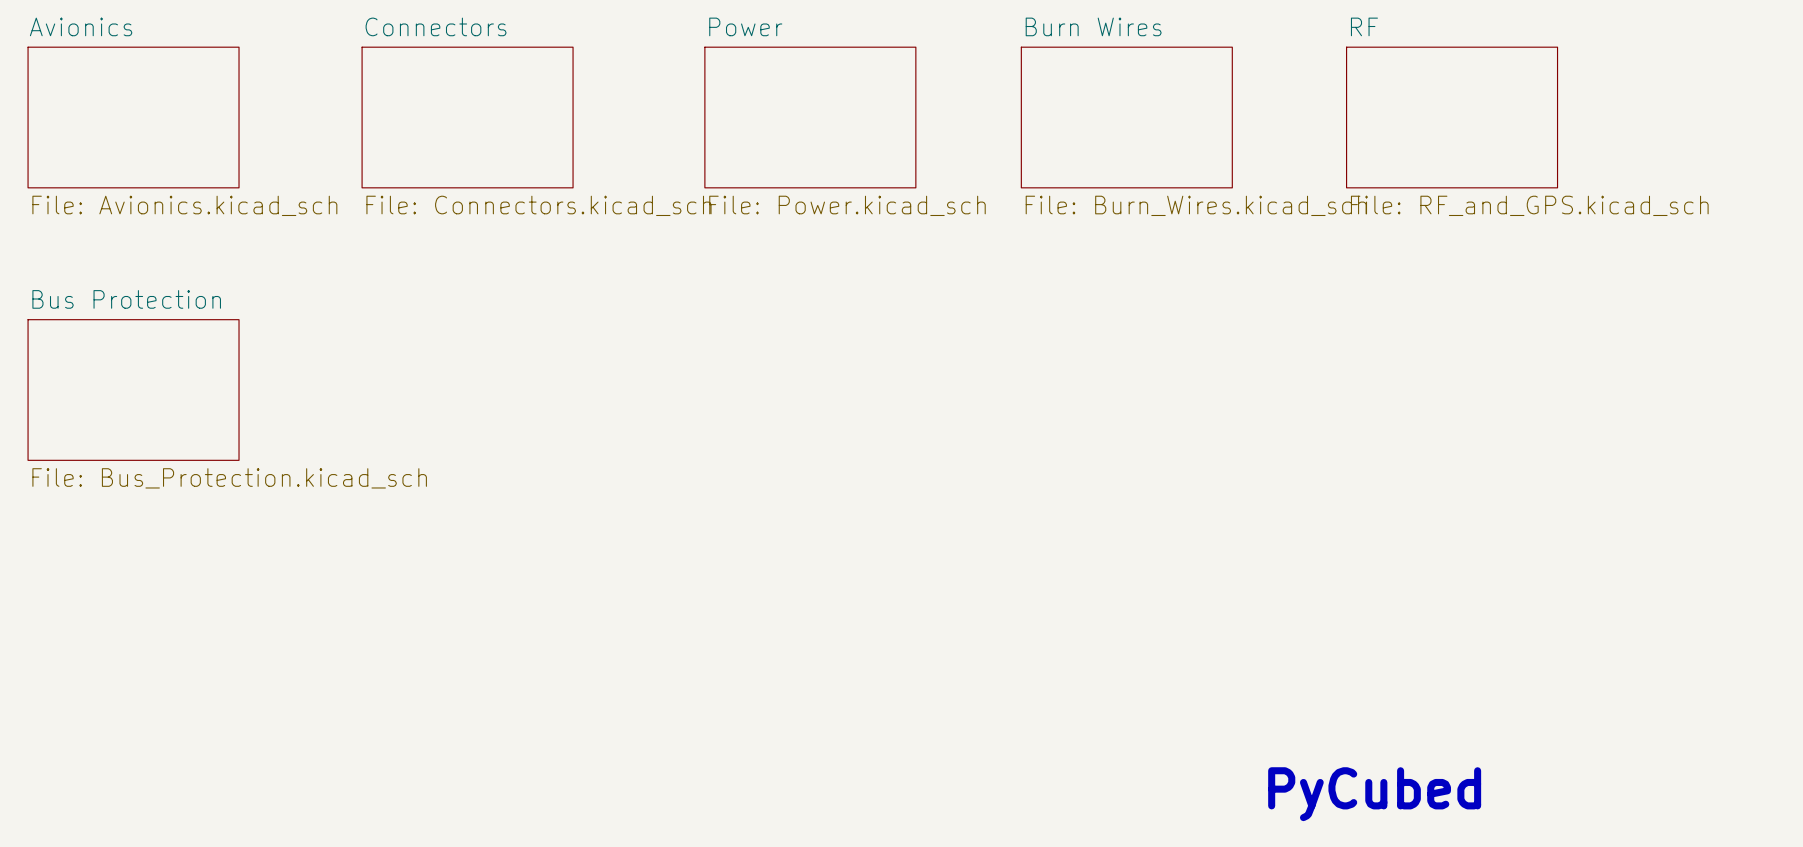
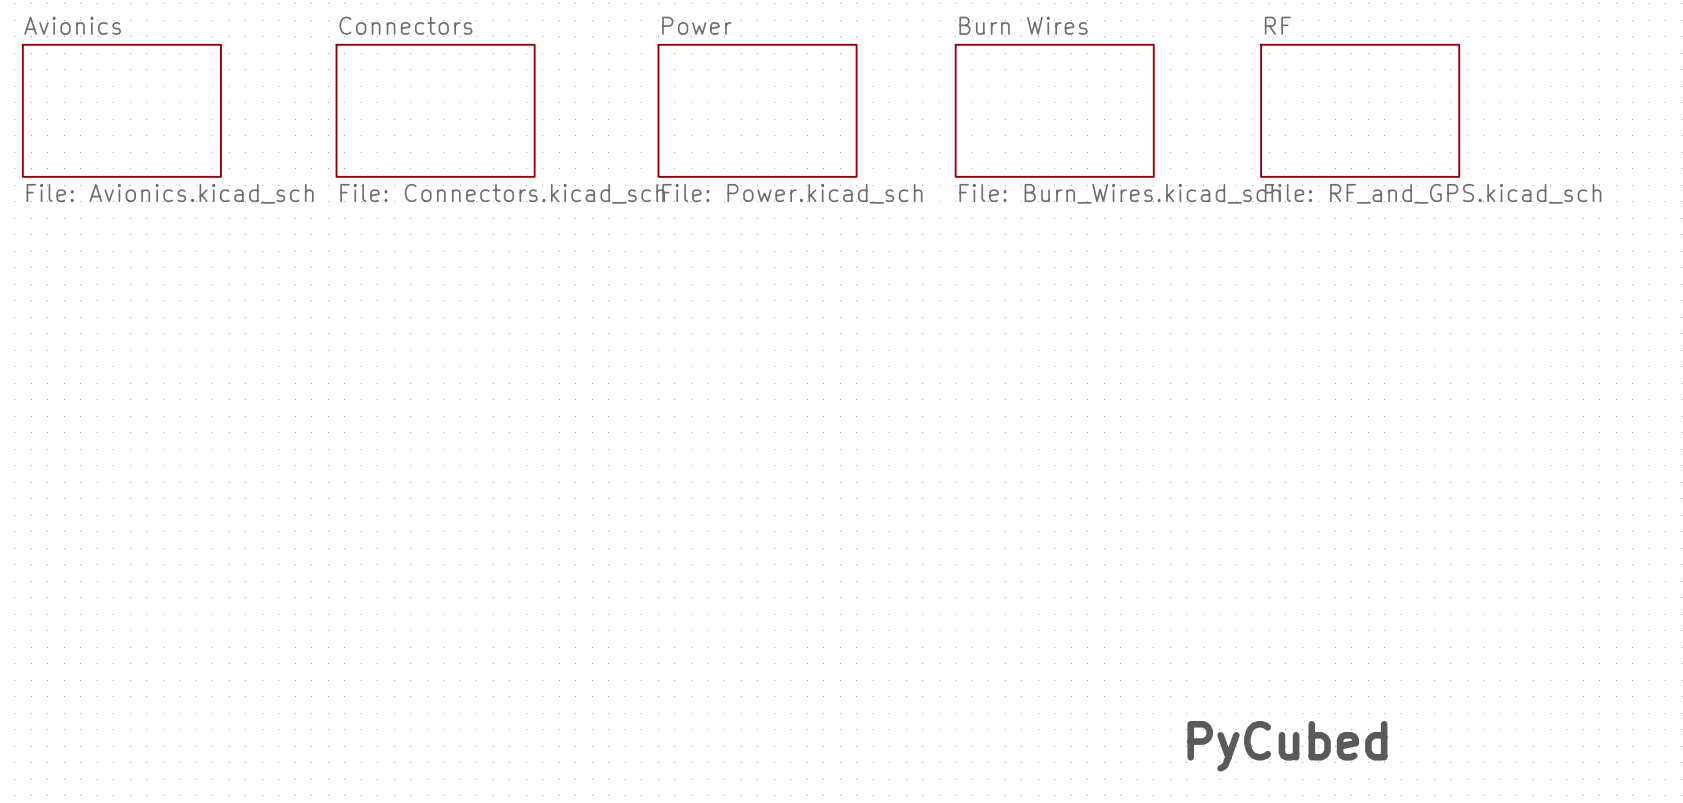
sheet Bus Protection: File: Bus_Protection.kicad_sch (133, 390) -> none

